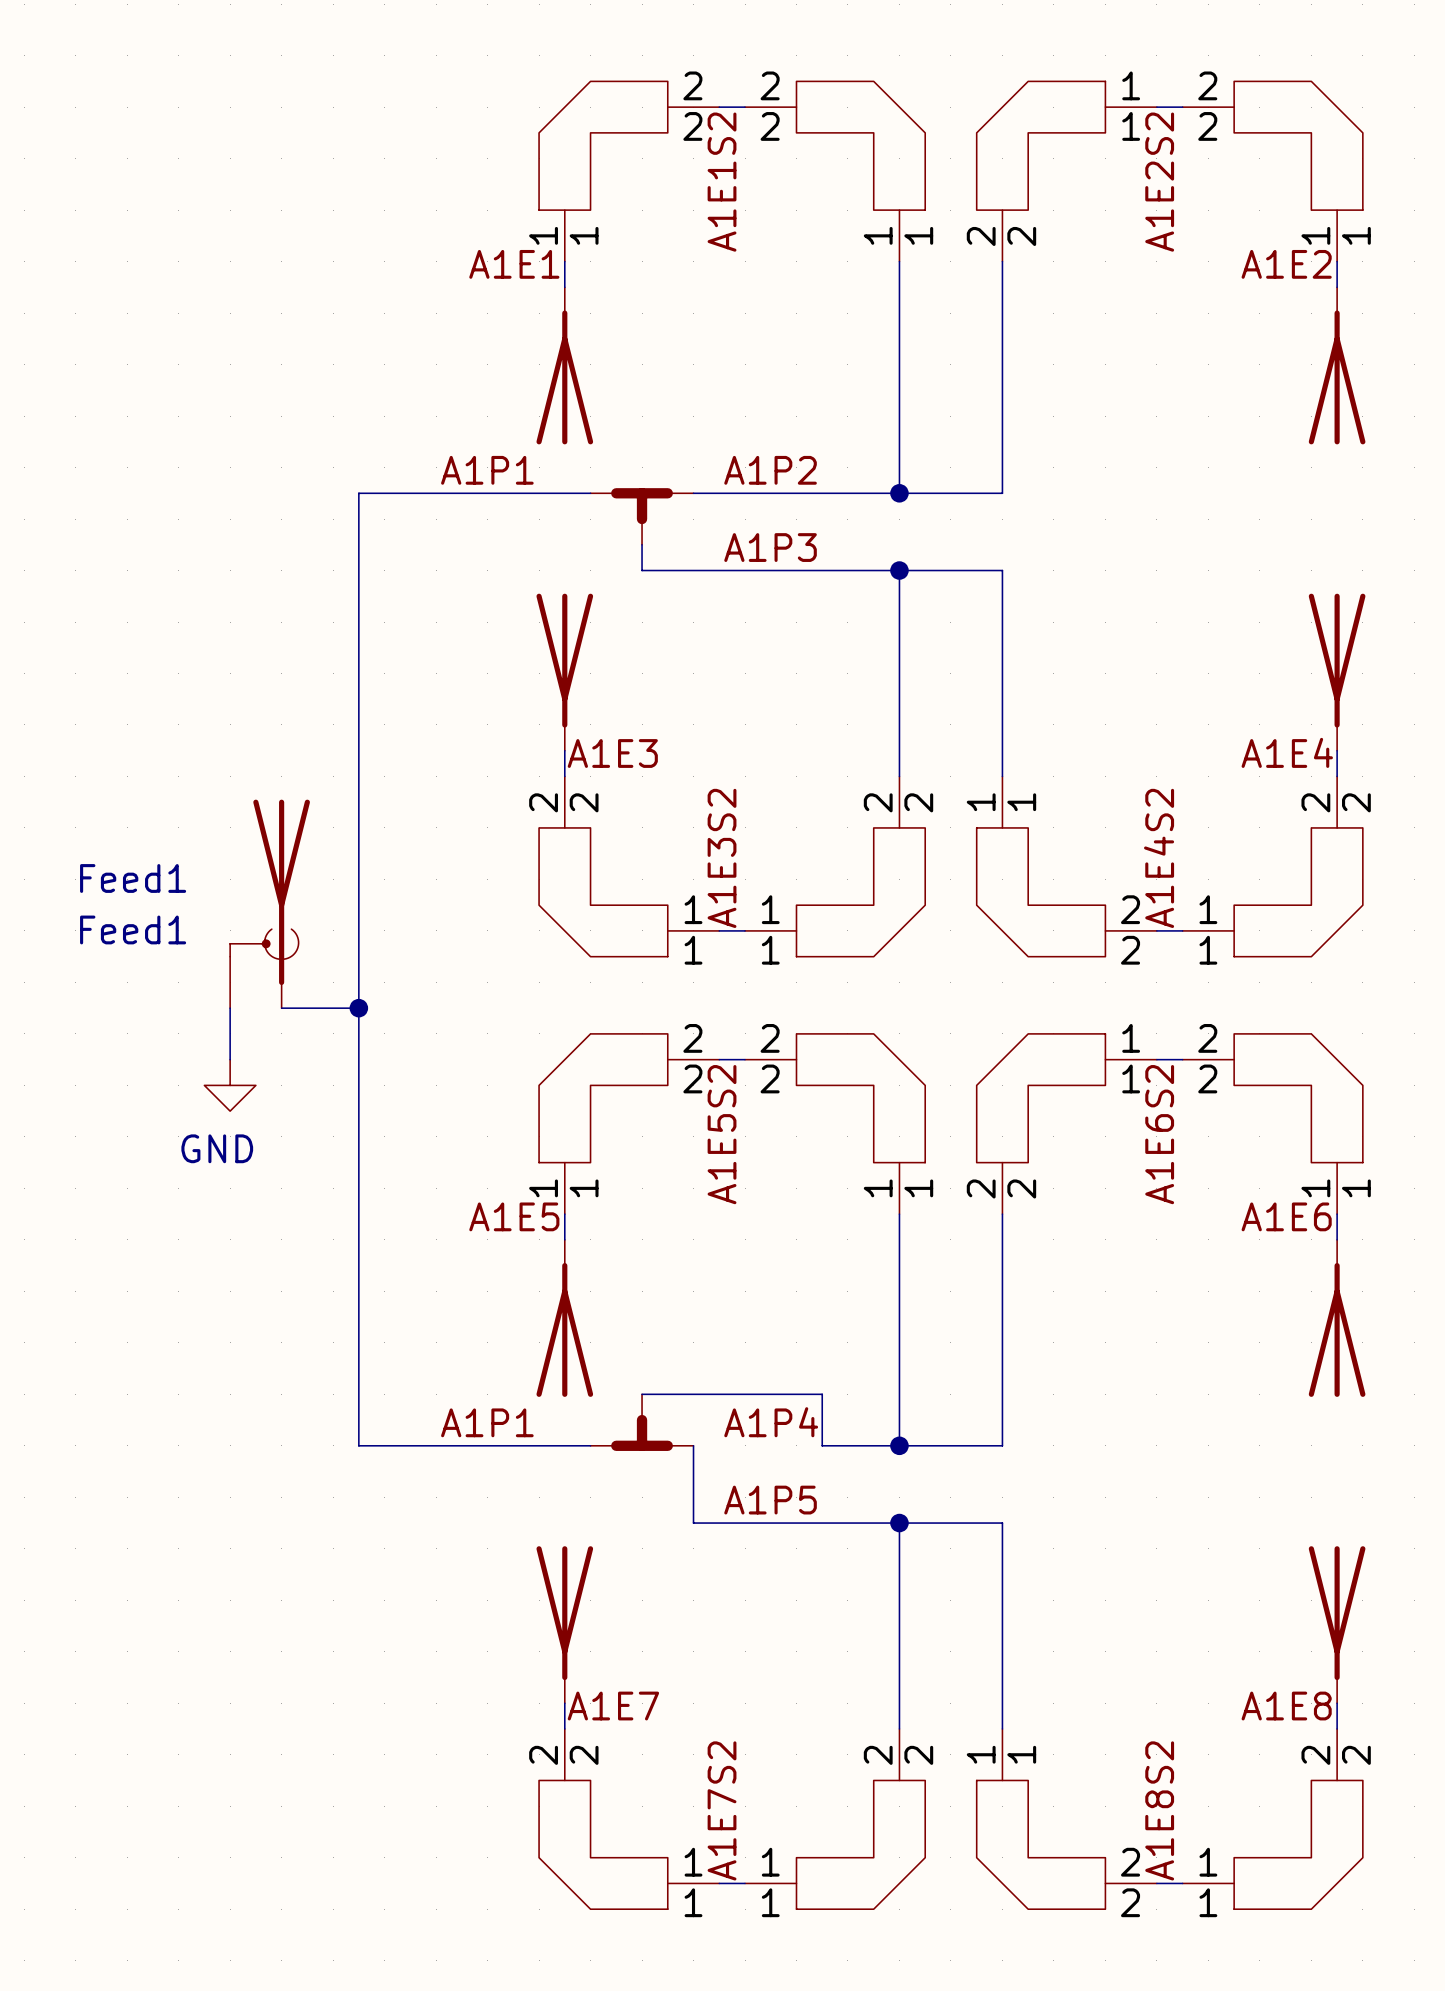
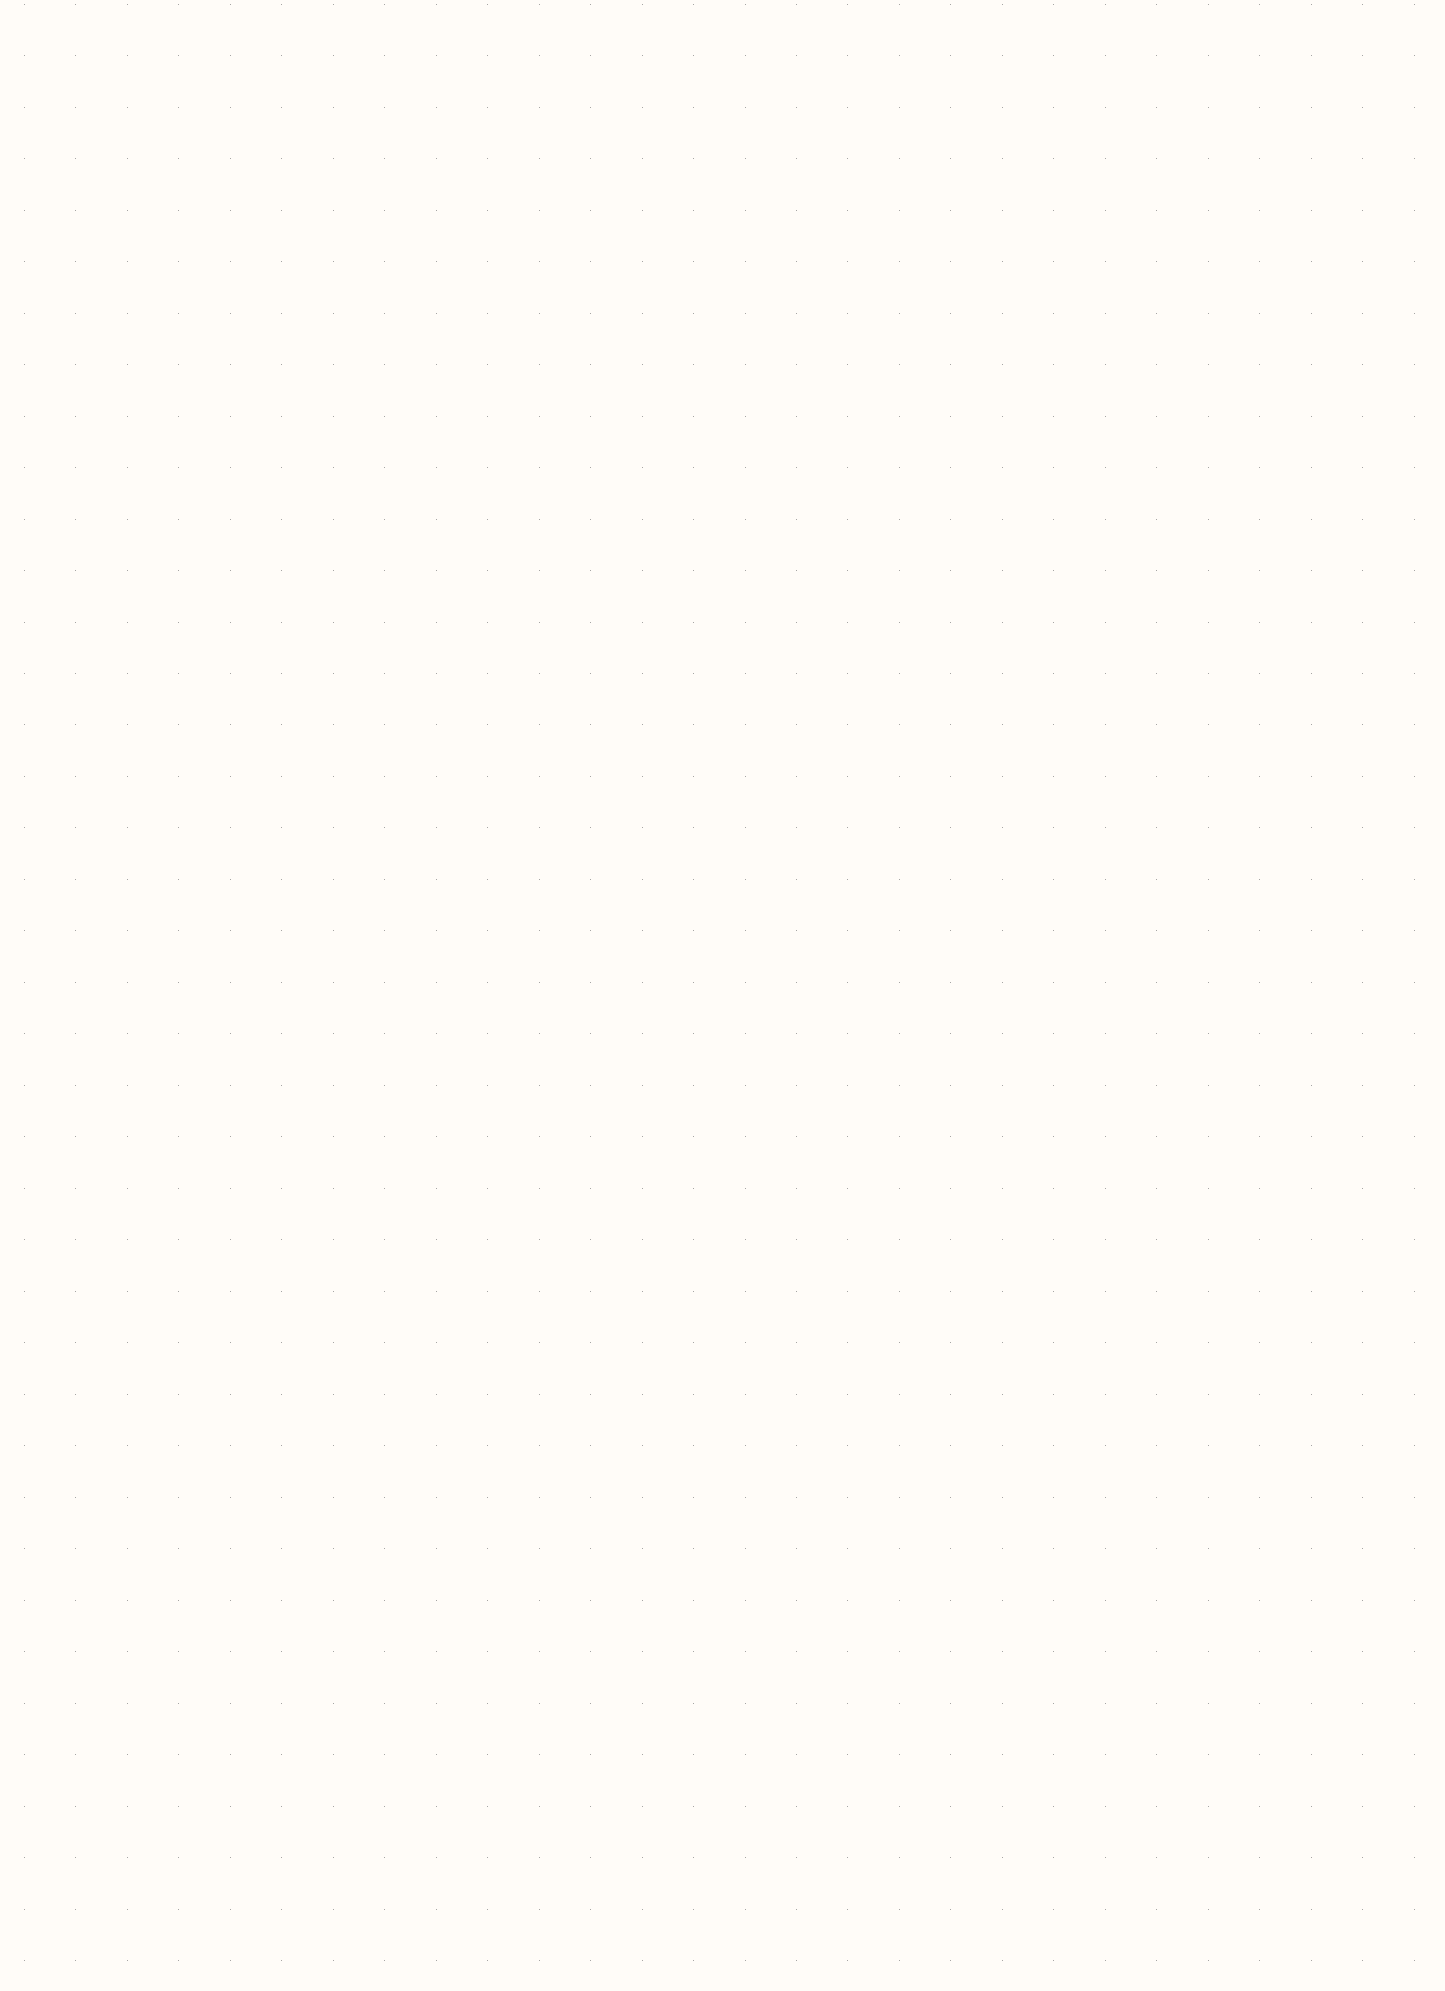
wire: (719, 107) (745, 107) -> none
wire: (1156, 107) (1182, 107) -> none
part: (629, 171) -> none
part: (835, 171) -> none
part: (1066, 171) -> none
part: (1272, 171) -> none
label: A1E1S2 (722, 182) -> none
label: A1E2S2 (1159, 182) -> none
wire: (564, 261) (564, 287) -> none
wire: (899, 261) (899, 493) -> none
wire: (1002, 261) (1002, 493) (693, 493) -> none
wire: (1337, 261) (1337, 287) -> none
label: A1E1 (514, 264) -> none
label: A1E2 (1286, 264) -> none
part: (564, 365) -> none
part: (1337, 365) -> none
label: A1P1 (487, 470) -> none
label: A1P2 (770, 470) -> none
wire: (590, 493) (358, 493) (358, 1445) (590, 1445) -> none
junction: (899, 493) -> none
part: (642, 517) -> none
wire: (642, 544) (642, 570) (1002, 570) (1002, 776) -> none
label: A1P3 (770, 547) -> none
wire: (899, 570) (899, 776) -> none
junction: (899, 570) -> none
part: (564, 672) -> none
part: (1337, 672) -> none
wire: (564, 750) (564, 776) -> none
wire: (1337, 750) (1337, 776) -> none
label: A1E4 (1287, 752) -> none
label: A1E3 (612, 753) -> none
label: A1E3S2 (722, 858) -> none
label: A1E4S2 (1159, 858) -> none
part: (629, 866) -> none
part: (835, 866) -> none
part: (1066, 866) -> none
part: (1272, 866) -> none
Feed1: Feed1 (270, 903) -> none
wire: (719, 930) (745, 930) -> none
wire: (1156, 930) (1182, 930) -> none
wire: (230, 1008) (230, 1059) -> none
wire: (281, 1008) (358, 1008) -> none
junction: (358, 1008) -> none
wire: (719, 1059) (745, 1059) -> none
wire: (1156, 1059) (1182, 1059) -> none
power symbol: GND (230, 1085) -> none
part: (629, 1124) -> none
part: (835, 1124) -> none
part: (1066, 1124) -> none
part: (1272, 1124) -> none
label: A1E5S2 (722, 1134) -> none
label: A1E6S2 (1159, 1134) -> none
wire: (564, 1214) (564, 1239) -> none
wire: (899, 1214) (899, 1445) -> none
wire: (1002, 1214) (1002, 1445) (822, 1445) (822, 1394) (642, 1394) -> none
wire: (1337, 1214) (1337, 1239) -> none
label: A1E5 (514, 1216) -> none
label: A1E6 (1286, 1216) -> none
part: (564, 1318) -> none
part: (1337, 1318) -> none
part: (642, 1421) -> none
label: A1P1 (487, 1422) -> none
label: A1P4 (771, 1422) -> none
wire: (693, 1445) (693, 1523) (1002, 1523) (1002, 1728) -> none
junction: (899, 1445) -> none
label: A1P5 (770, 1500) -> none
wire: (899, 1523) (899, 1728) -> none
junction: (899, 1523) -> none
part: (564, 1624) -> none
part: (1337, 1624) -> none
wire: (564, 1703) (564, 1728) -> none
wire: (1337, 1703) (1337, 1728) -> none
label: A1E7 (613, 1706) -> none
label: A1E8 (1286, 1706) -> none
label: A1E7S2 (722, 1810) -> none
label: A1E8S2 (1159, 1810) -> none
part: (629, 1819) -> none
part: (835, 1819) -> none
part: (1066, 1819) -> none
part: (1272, 1819) -> none
wire: (719, 1883) (745, 1883) -> none
wire: (1156, 1883) (1182, 1883) -> none

